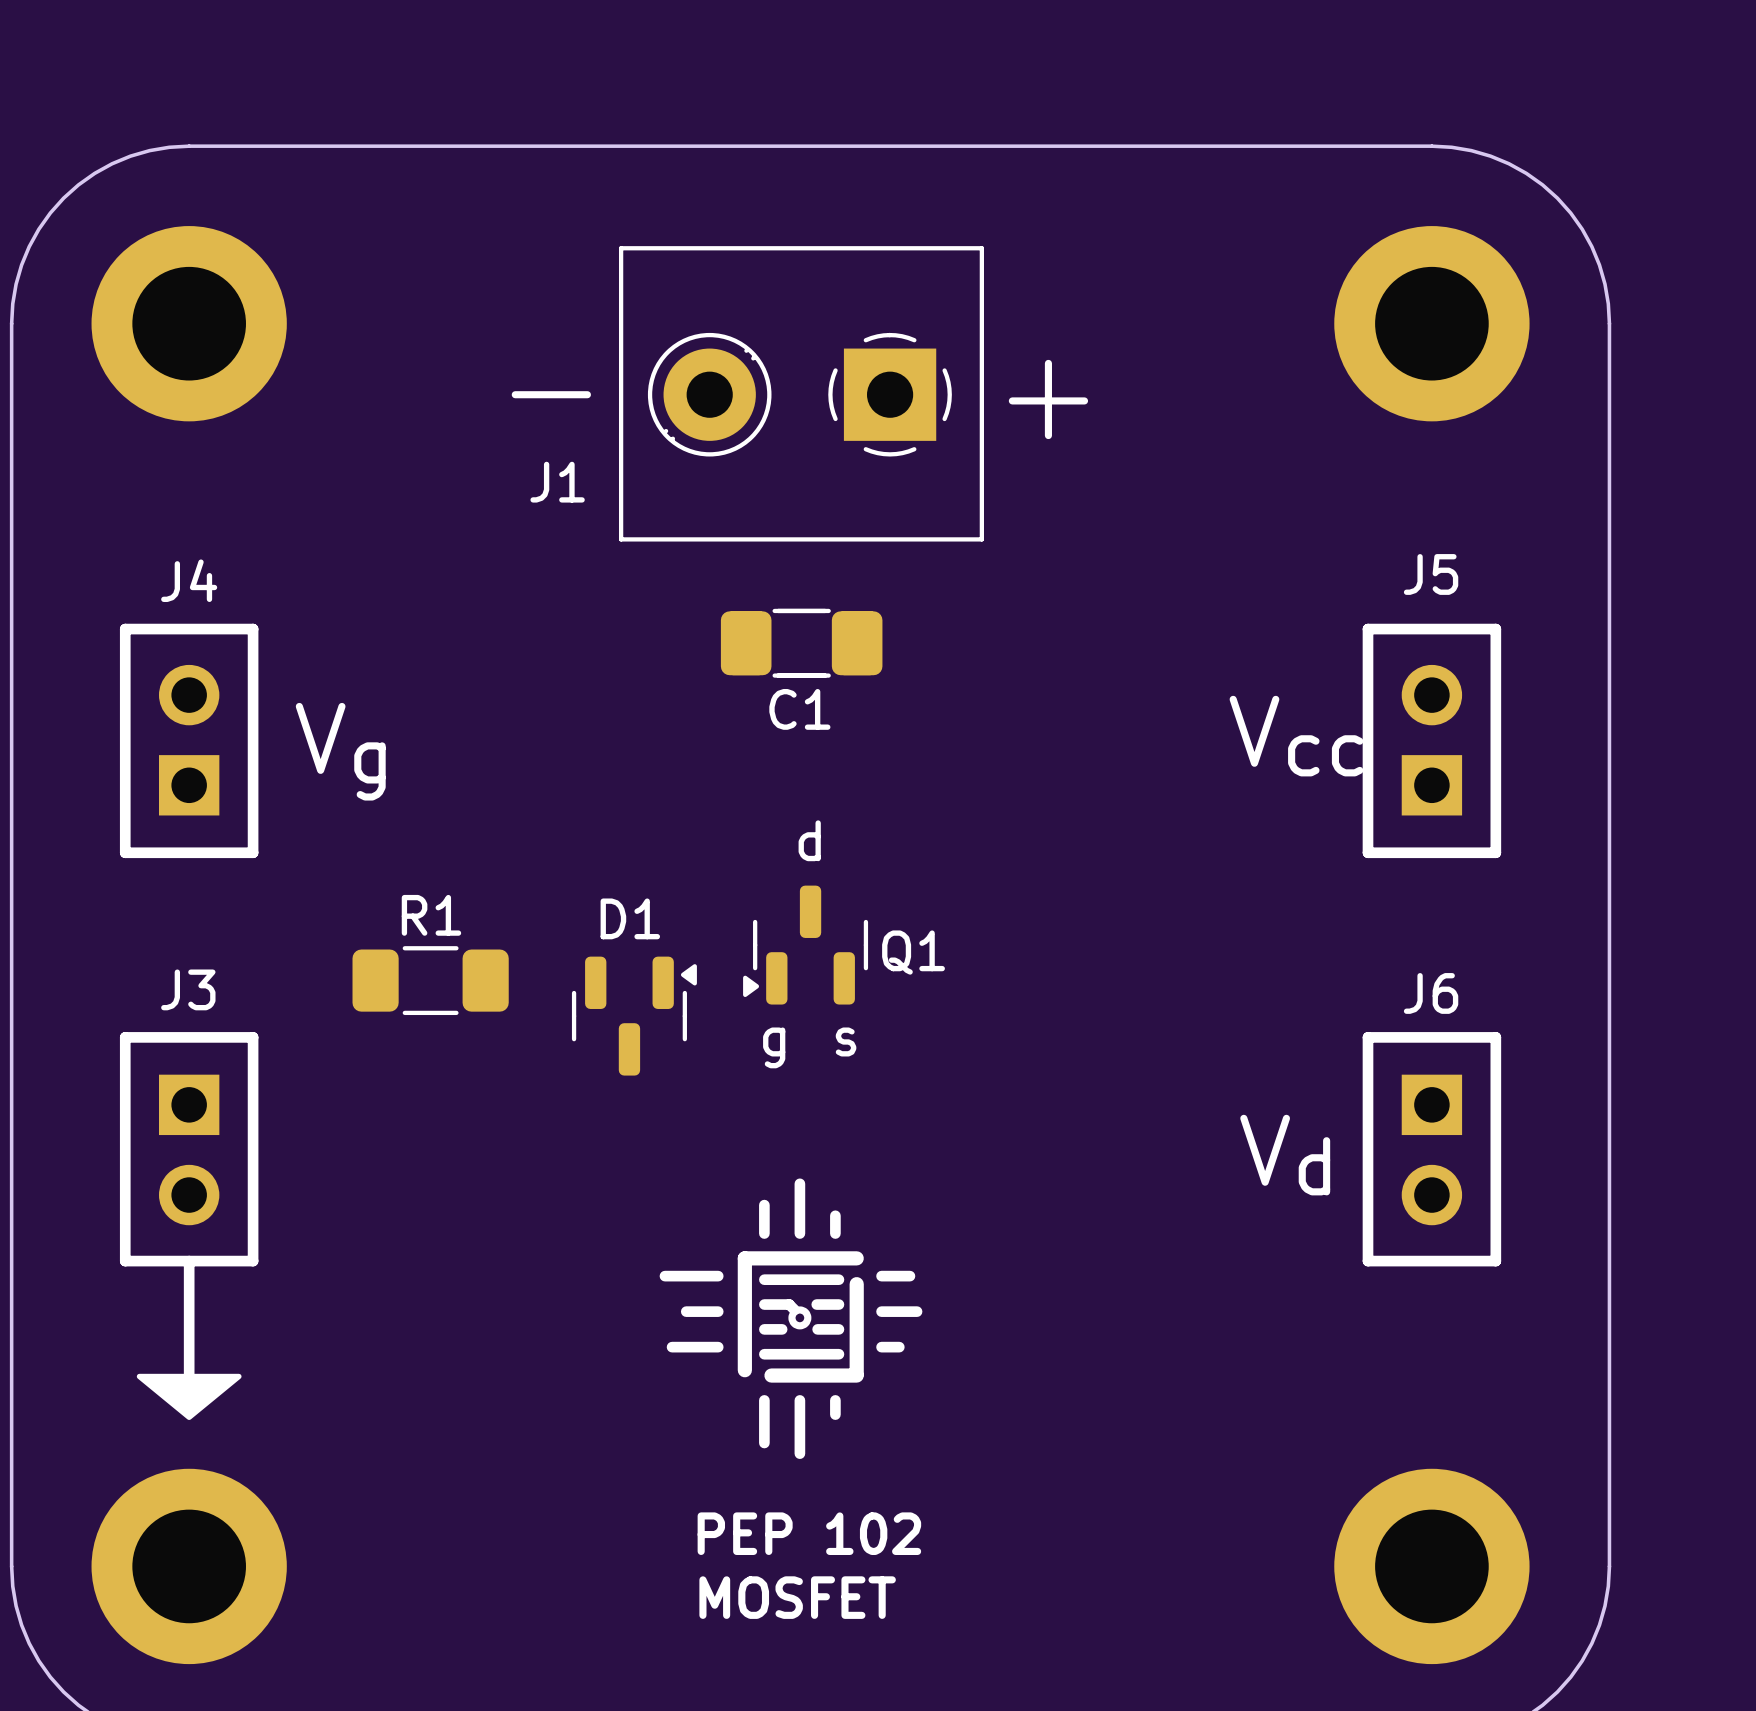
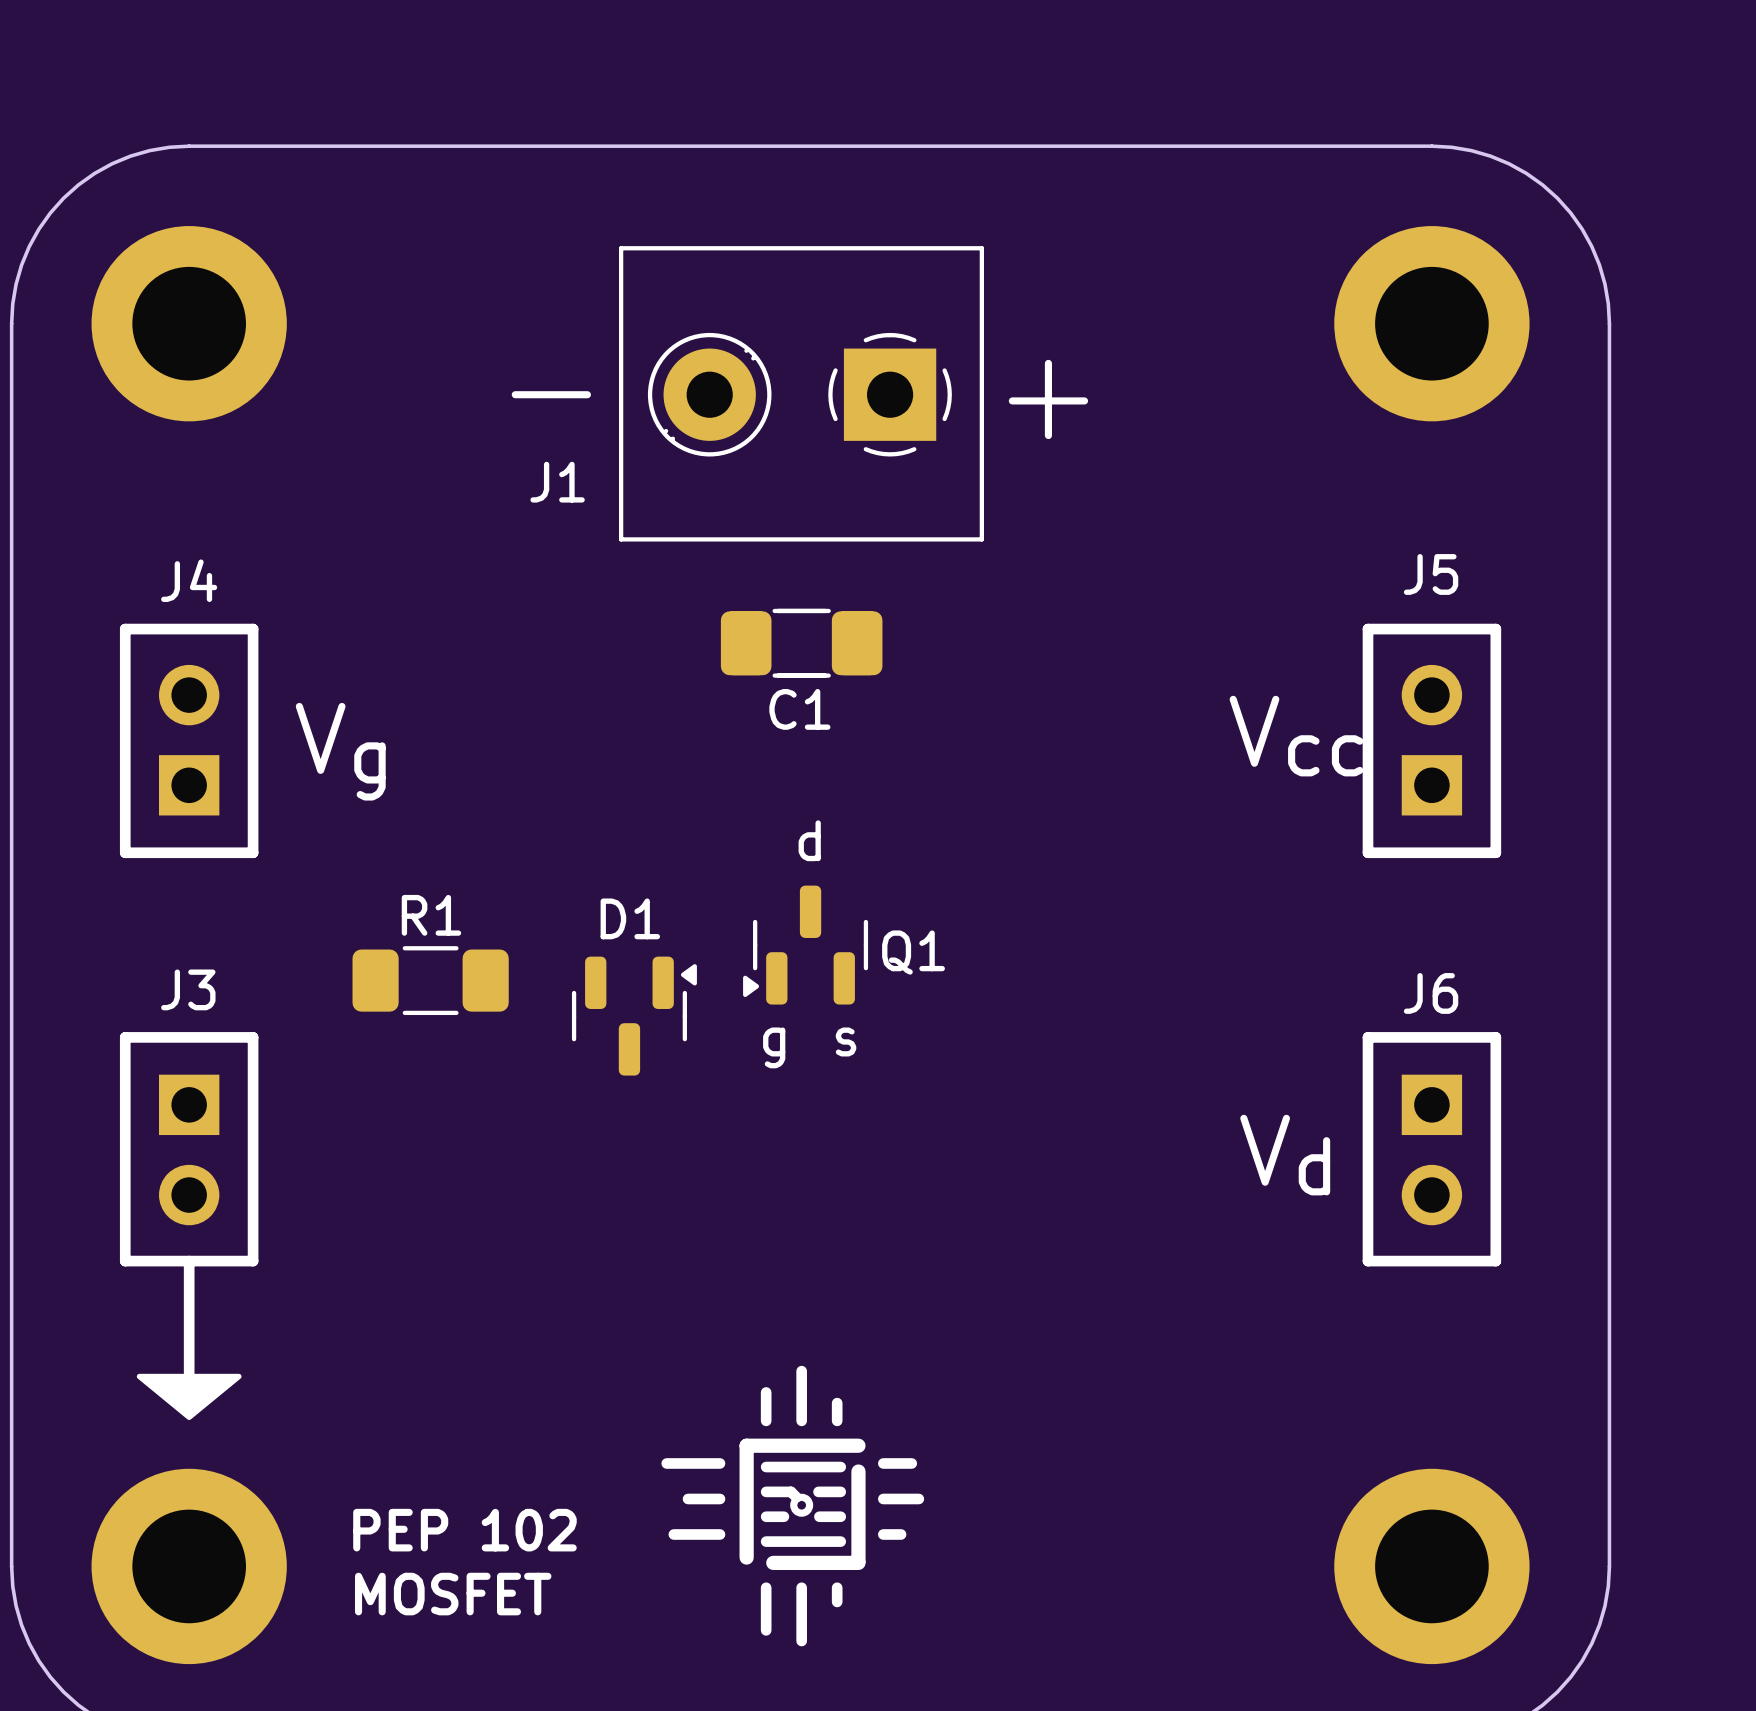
drawing position: (791, 1318) -> (792, 1506)
text position: PEP 102 (809, 1533) -> PEP 102 (464, 1530)
text position: MOSFET (797, 1597) -> MOSFET (453, 1594)

